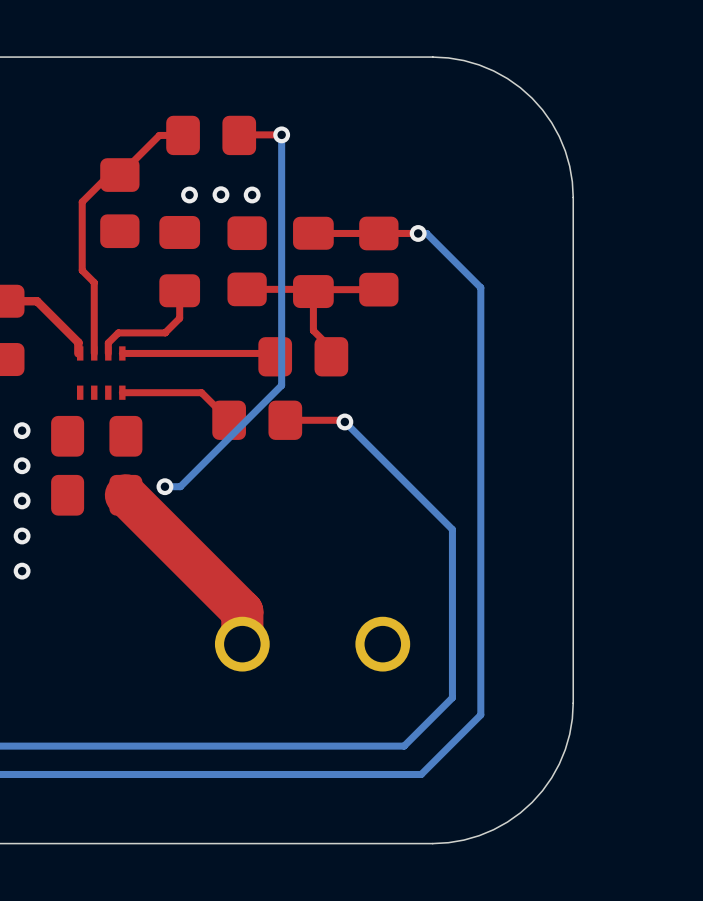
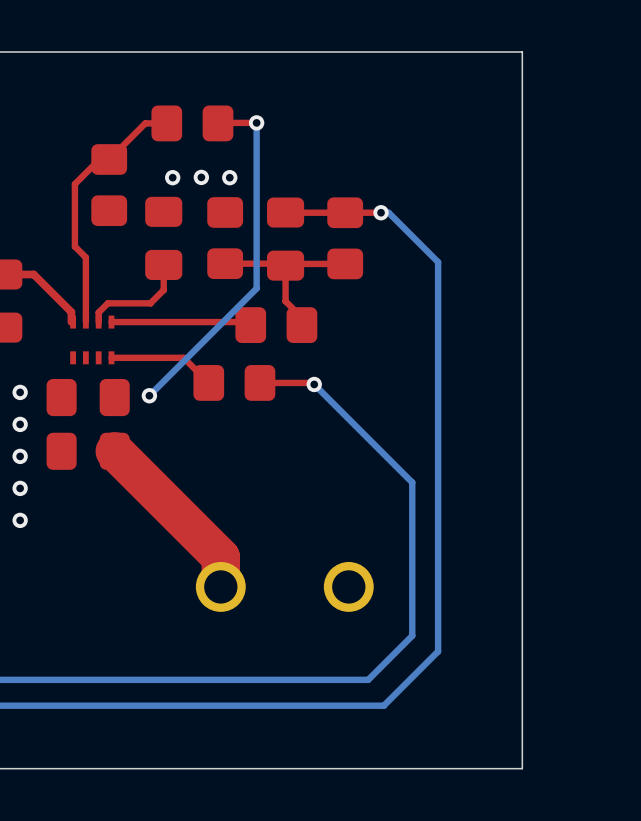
board edge: (432, 57) (448, 57) (479, 64) (507, 78) (532, 98) (551, 122) (565, 151) (572, 181) (573, 197) -> (394, 51) (522, 51) (522, 179)
bottom track: (281, 316) (281, 385) (180, 486) (164, 486) -> (256, 288) (149, 395)
via position: (164, 486) -> (149, 395)
board edge: (573, 703) (572, 718) (565, 749) (551, 777) (532, 802) (507, 822) (479, 835) (448, 842) (432, 843) -> (522, 640) (522, 768) (394, 768)

